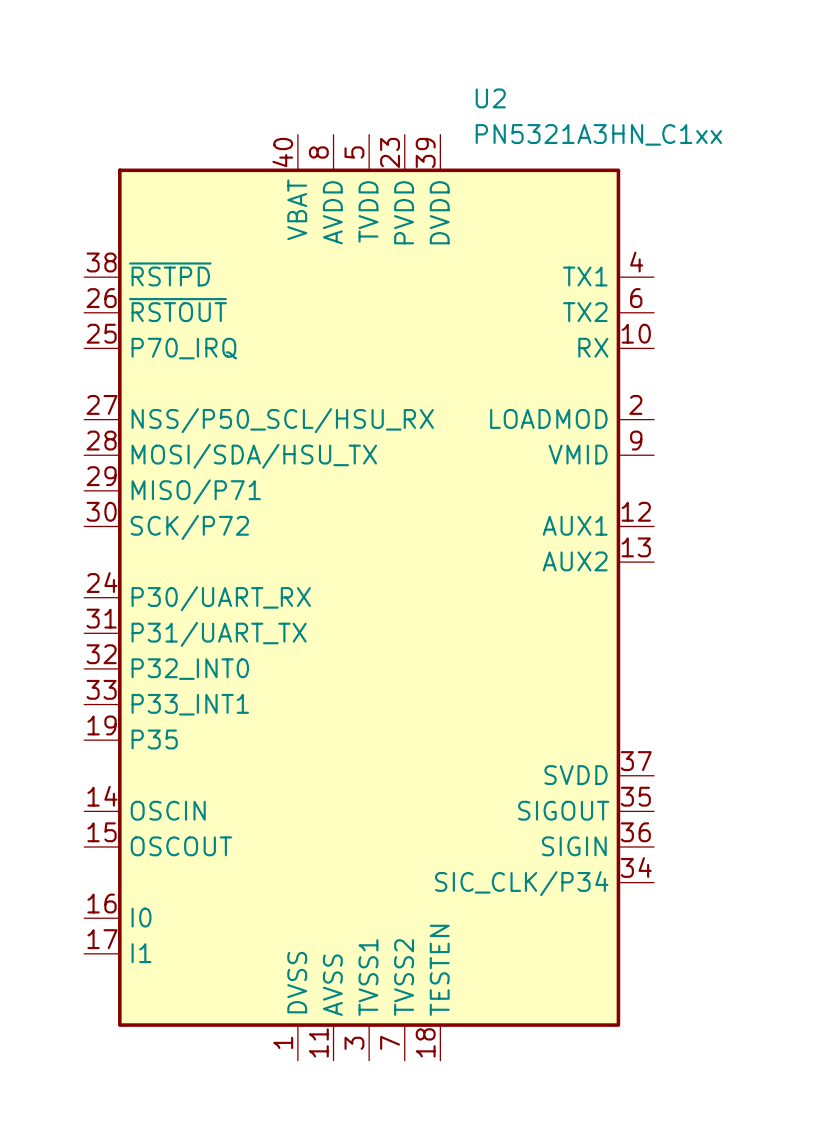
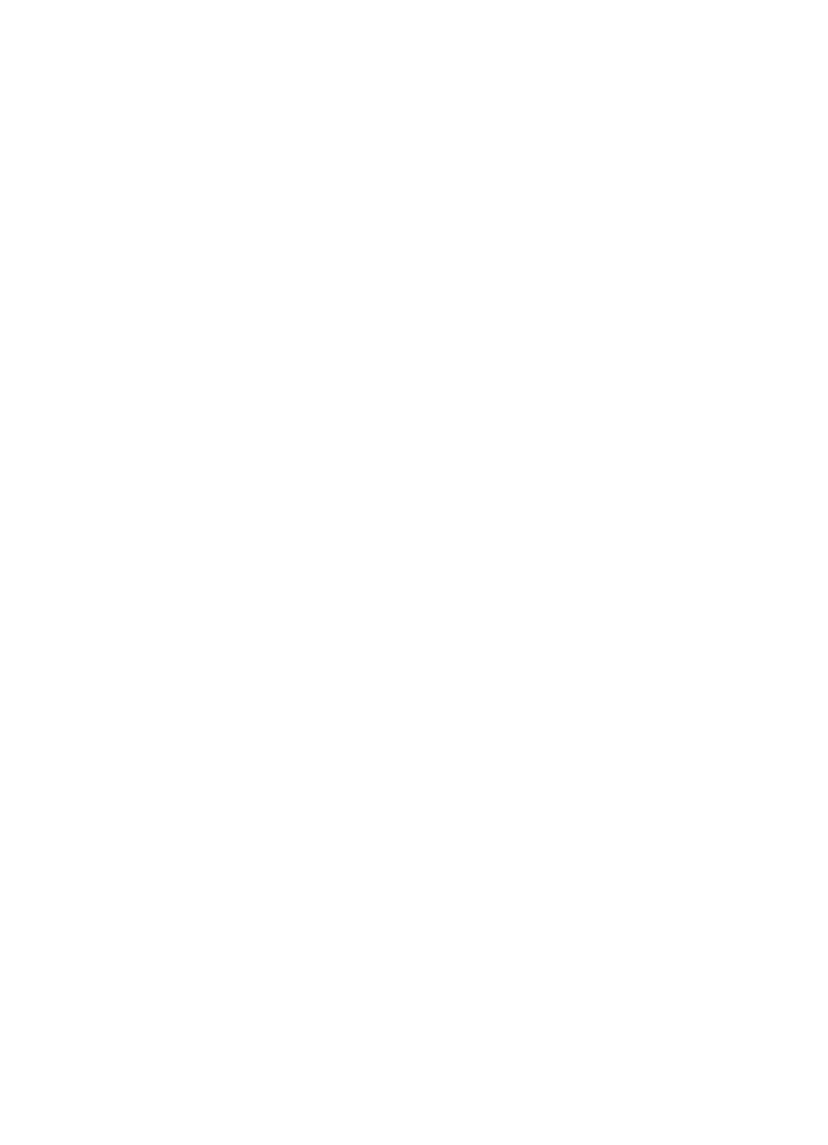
U2: PN5321A3HN_C1xx (369, 597) -> none

